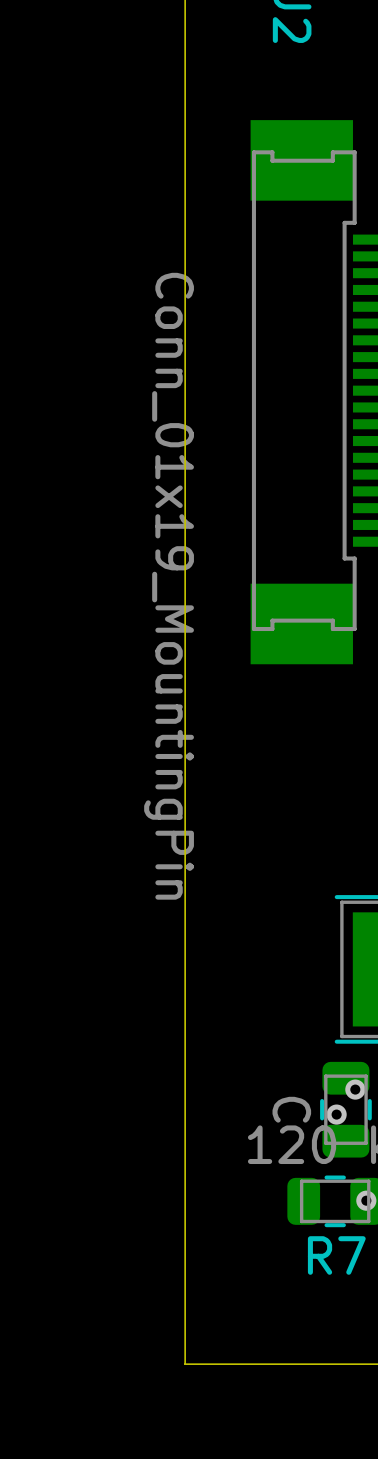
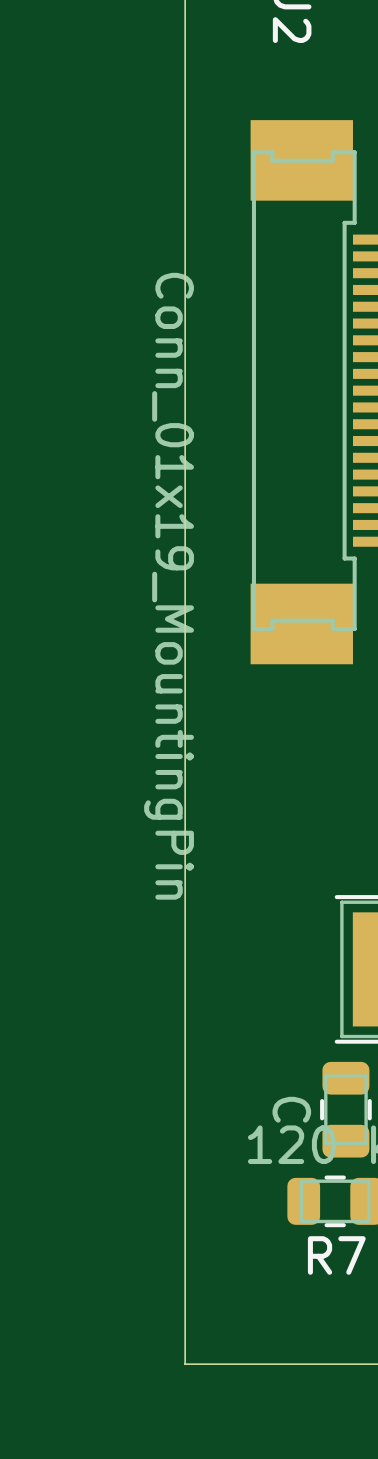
via: (355, 1089) -> none
via: (336, 1114) -> none
via: (366, 1200) -> none

